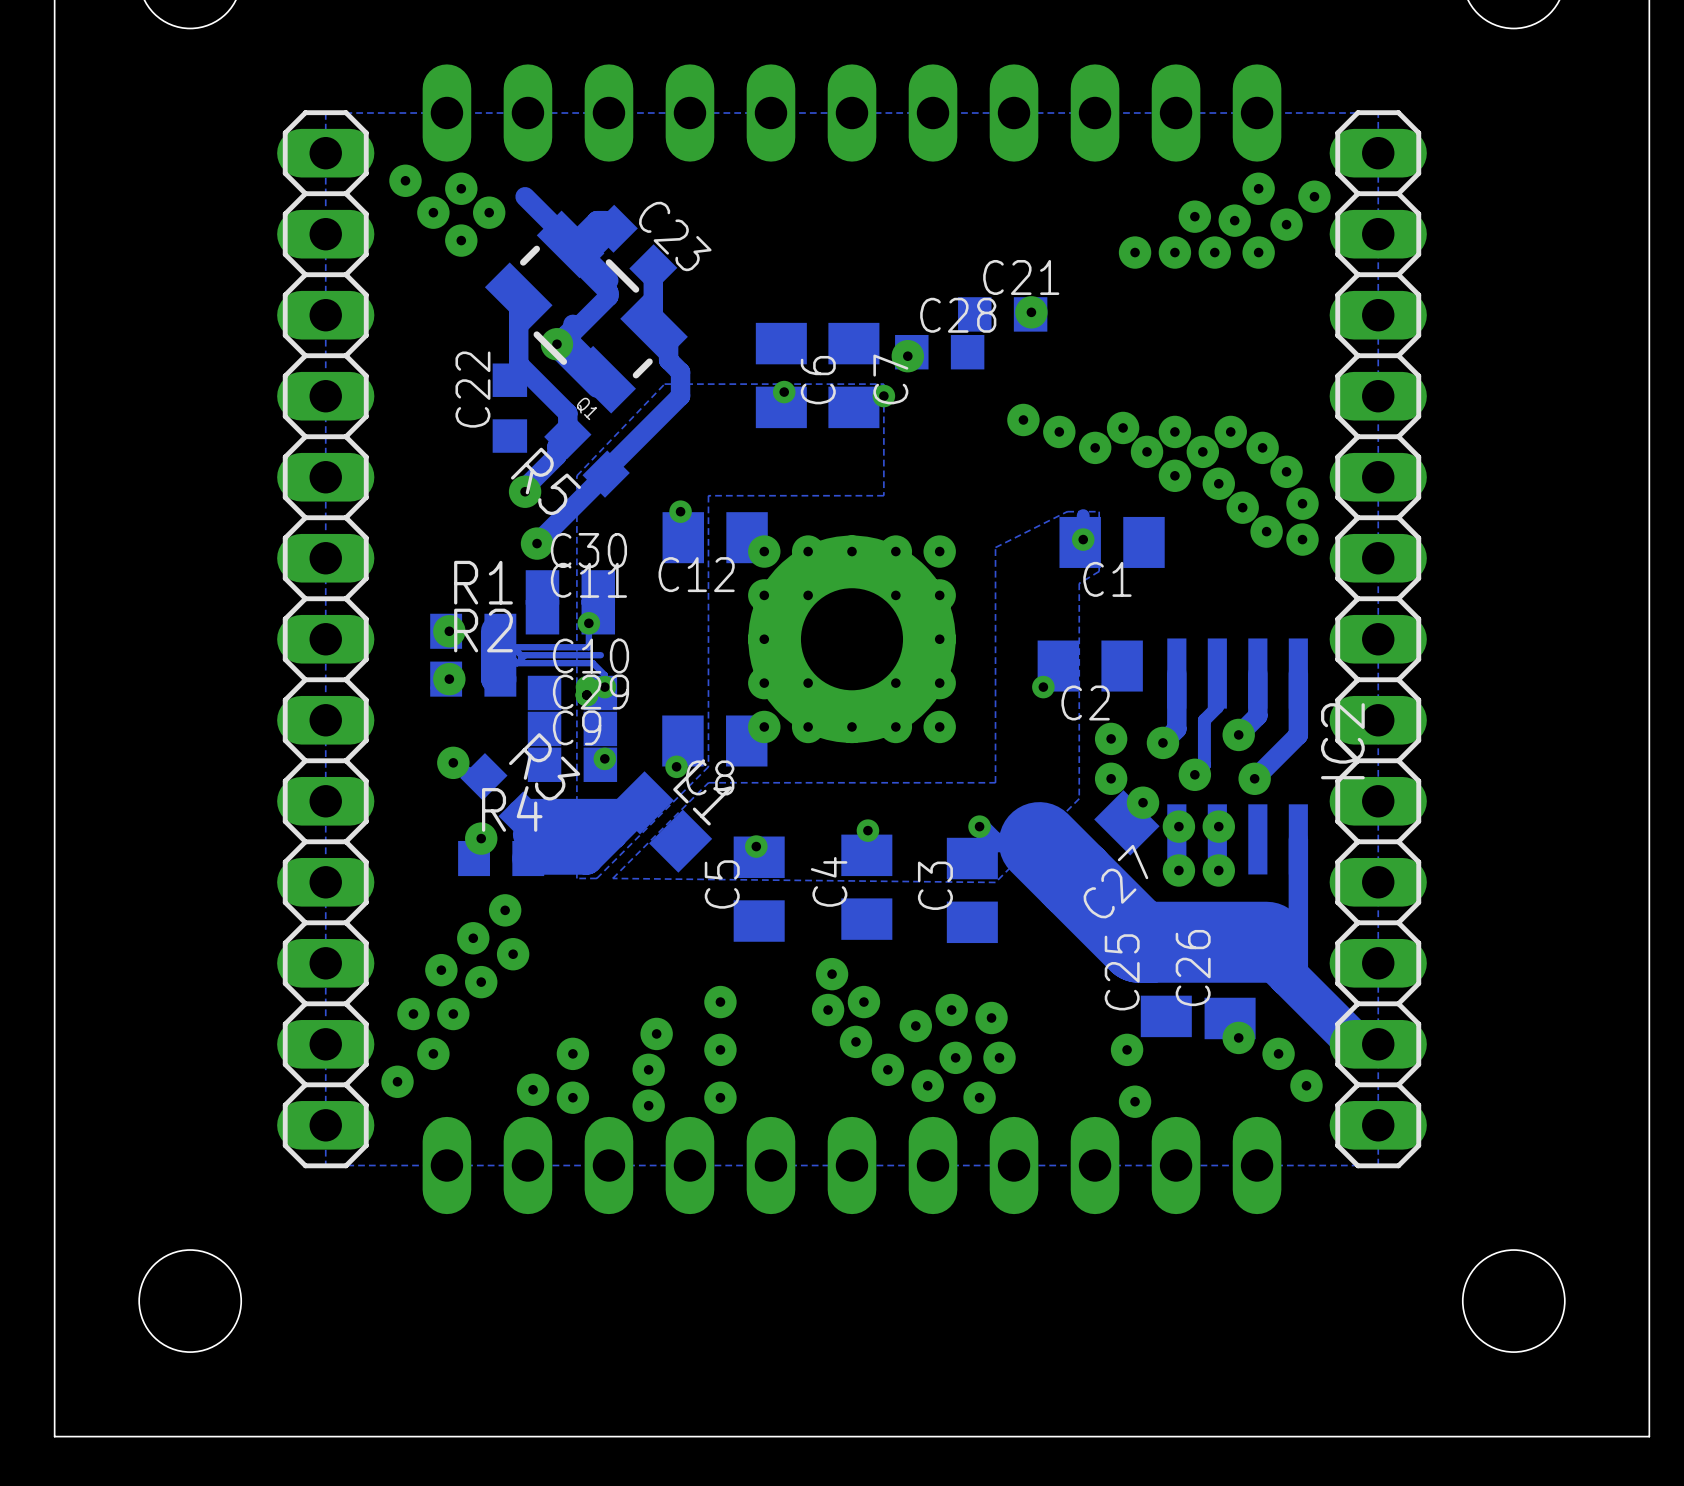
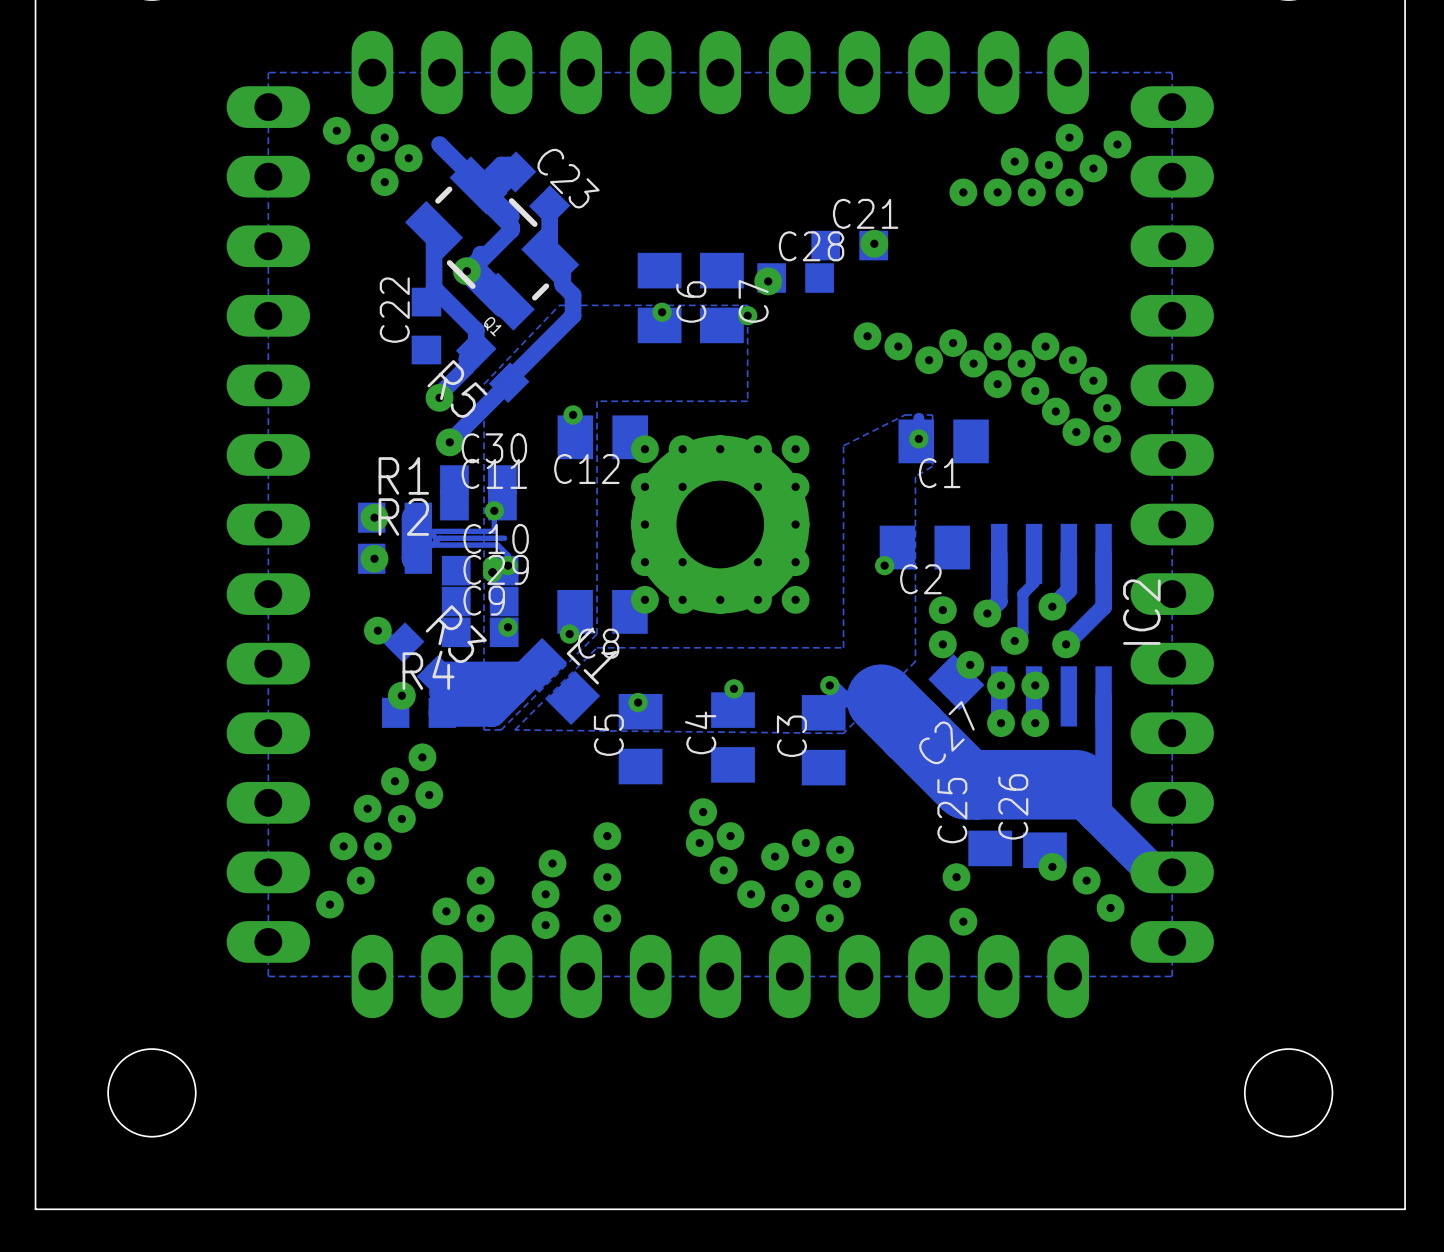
part side: bottom (325, 639) -> top (268, 524)
part side: bottom (1378, 639) -> top (1172, 524)

